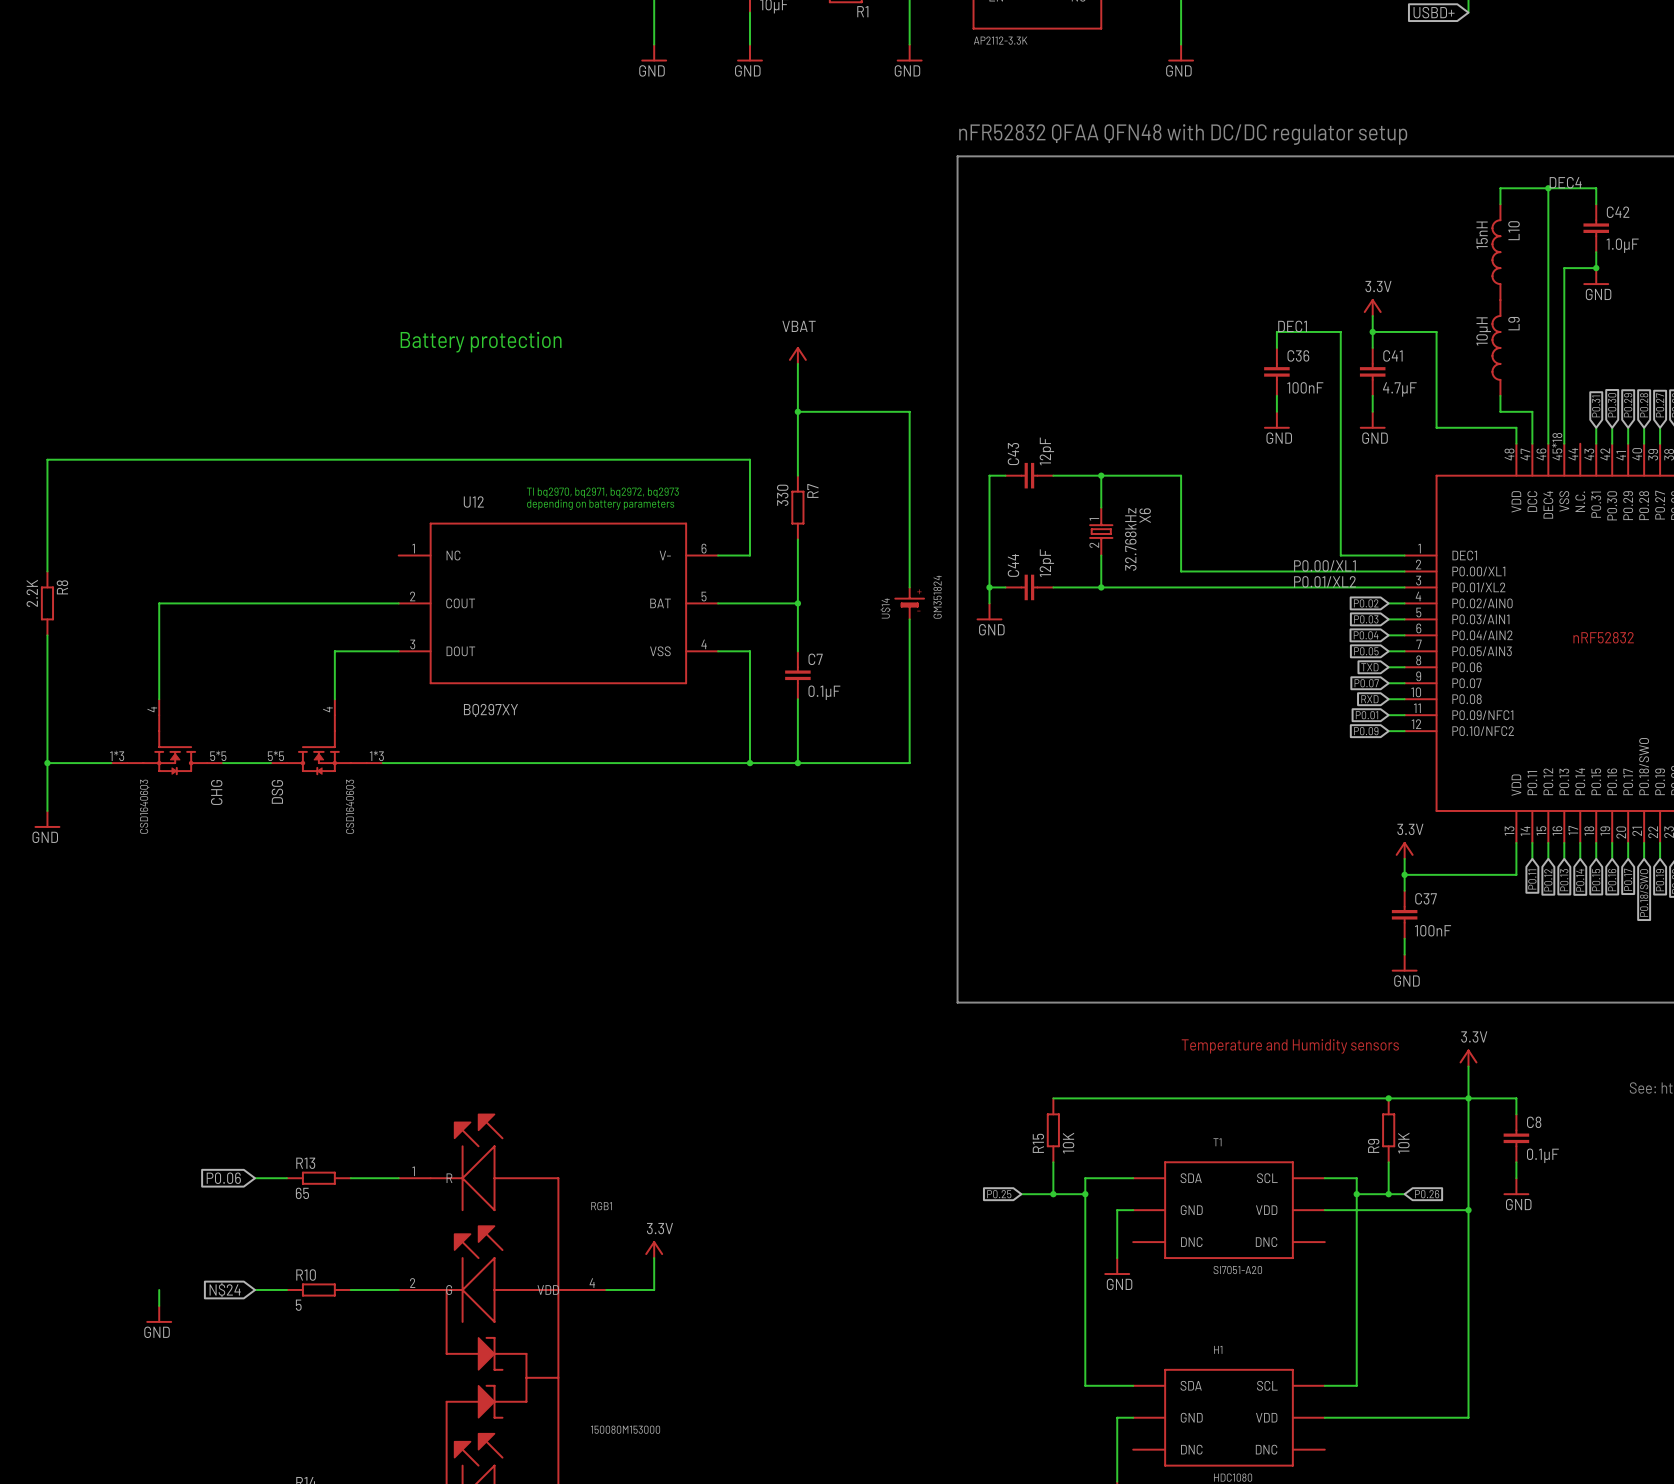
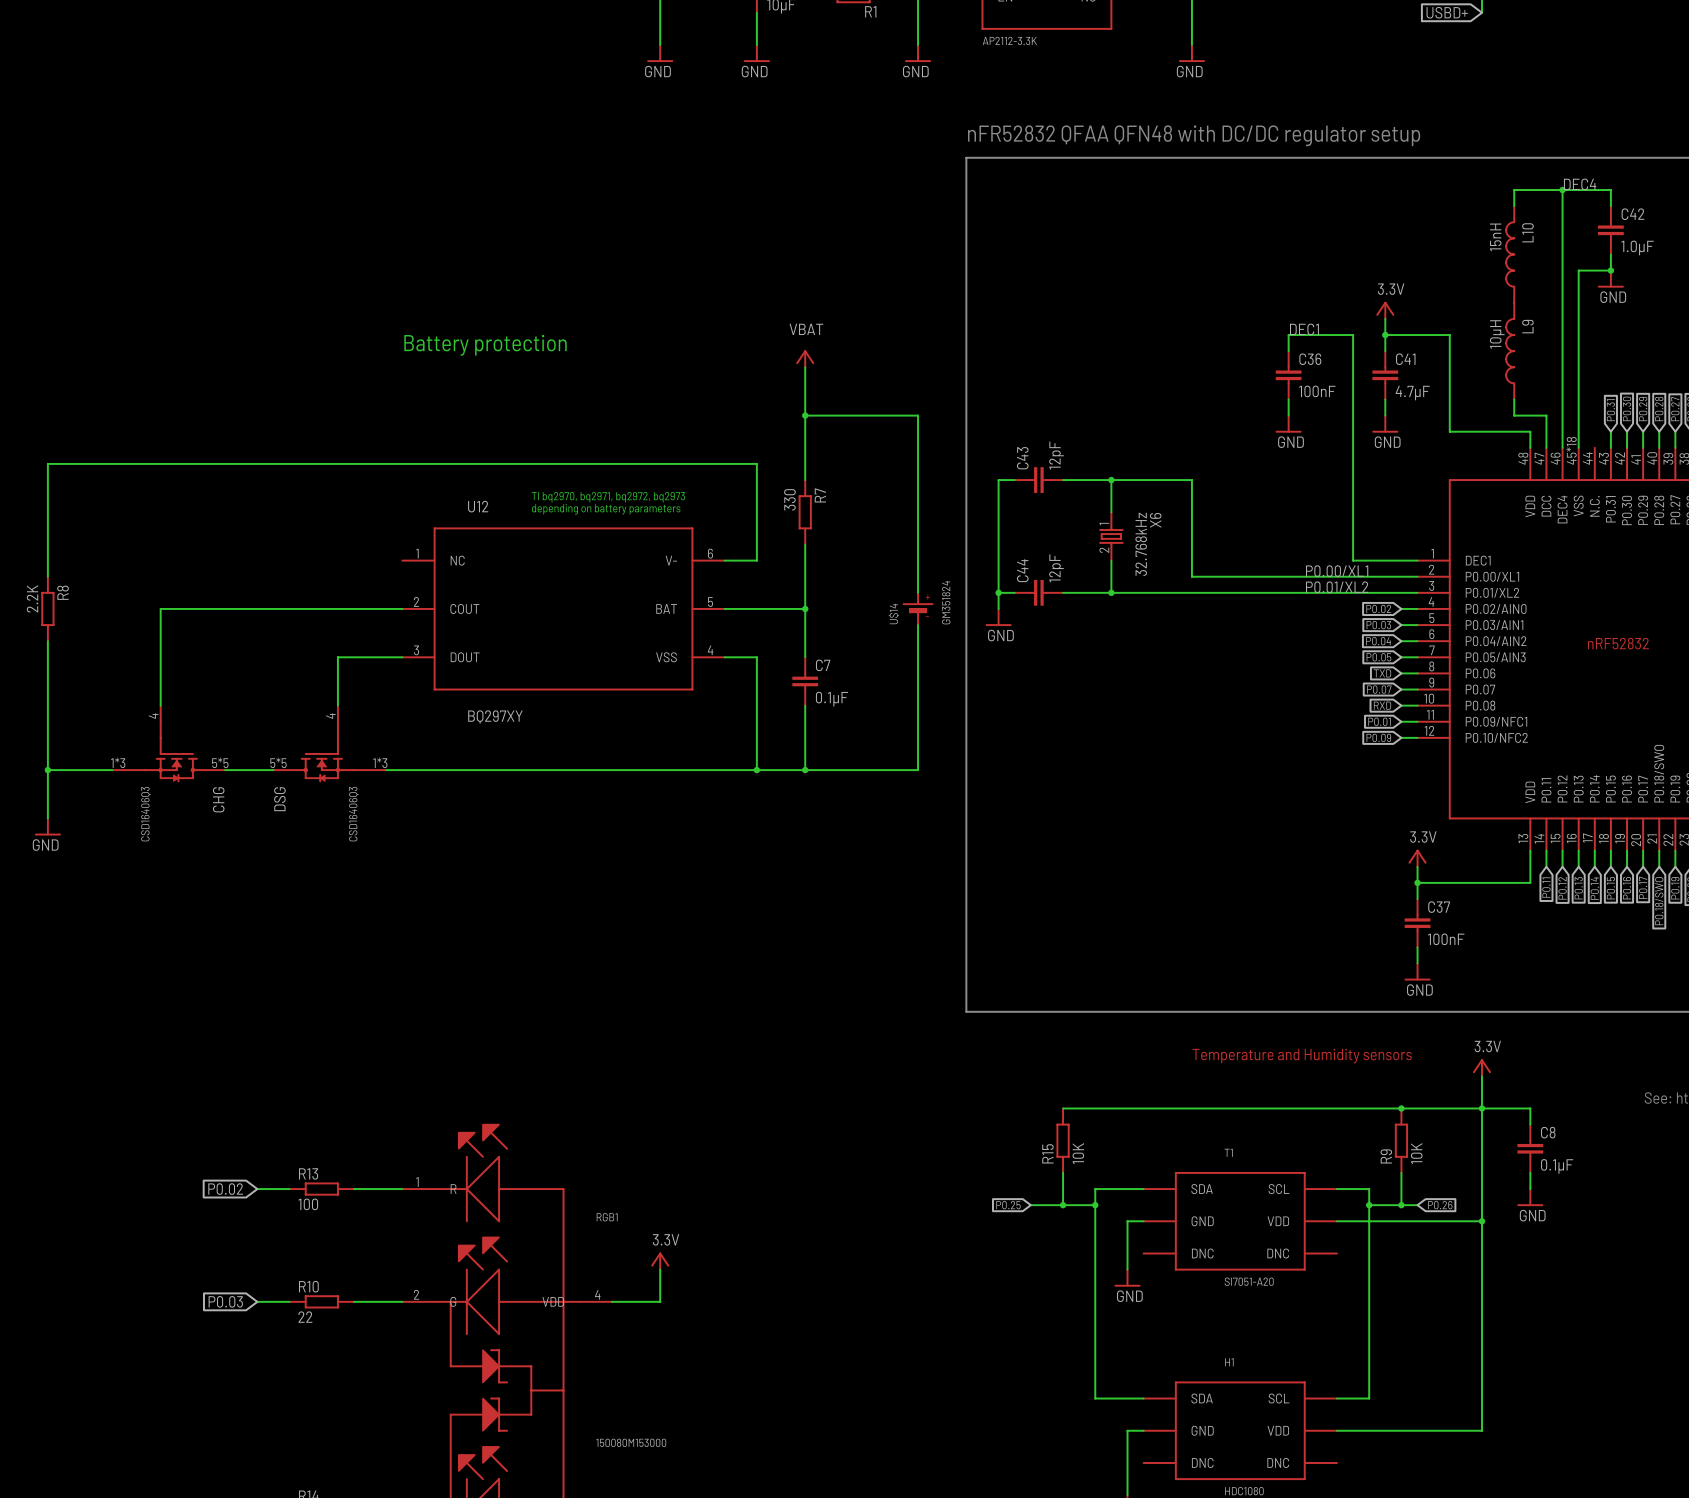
global label: P0.06 (223, 1178) -> P0.02 (225, 1189)
R13 value: 65 (302, 1193) -> 100 (308, 1204)
wire: (159, 1289) (159, 1305) -> none
global label: N$24 (225, 1289) -> P0.03 (225, 1301)
R10 value: 5 (298, 1305) -> 22 (305, 1317)
power symbol: GND (159, 1314) -> none

